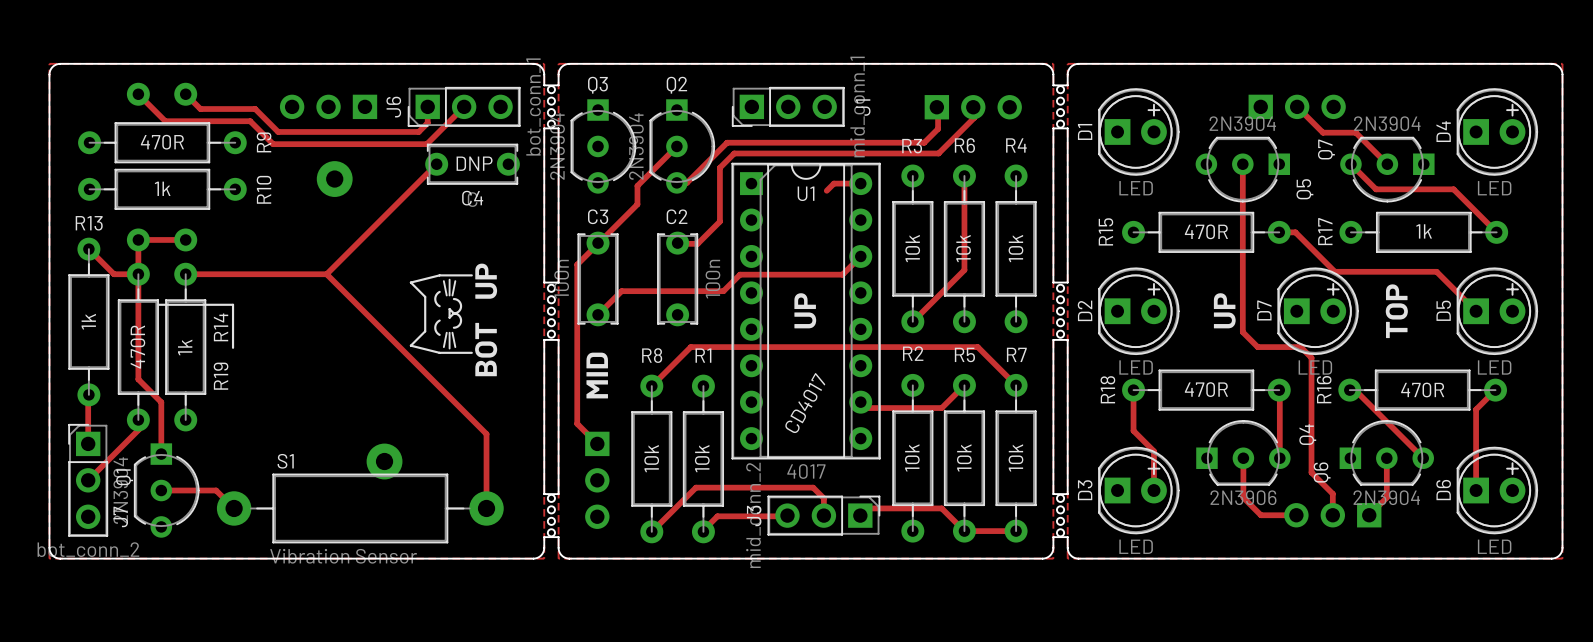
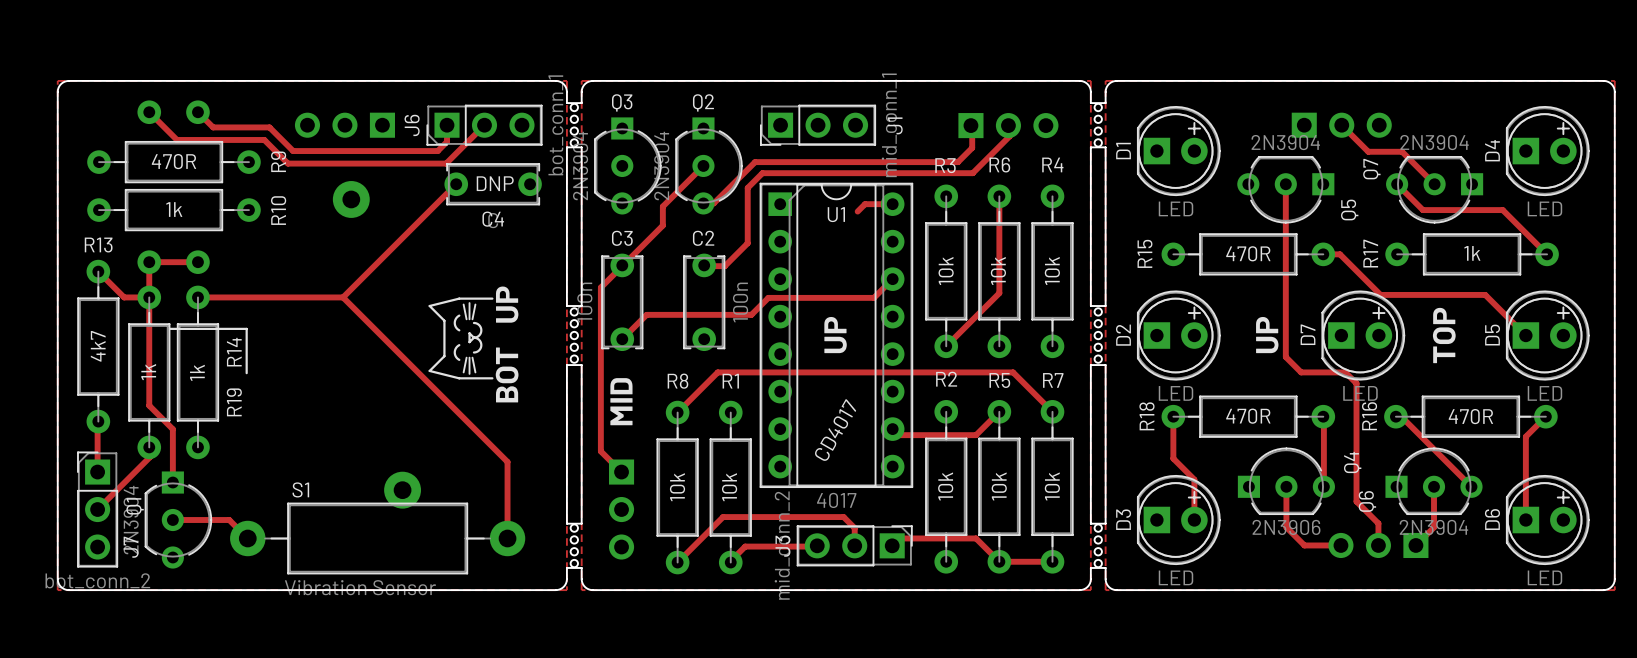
R13 value: 1k (88, 321) -> 4k7 (98, 346)
R14 value: 470R (137, 347) -> 1k (148, 372)

